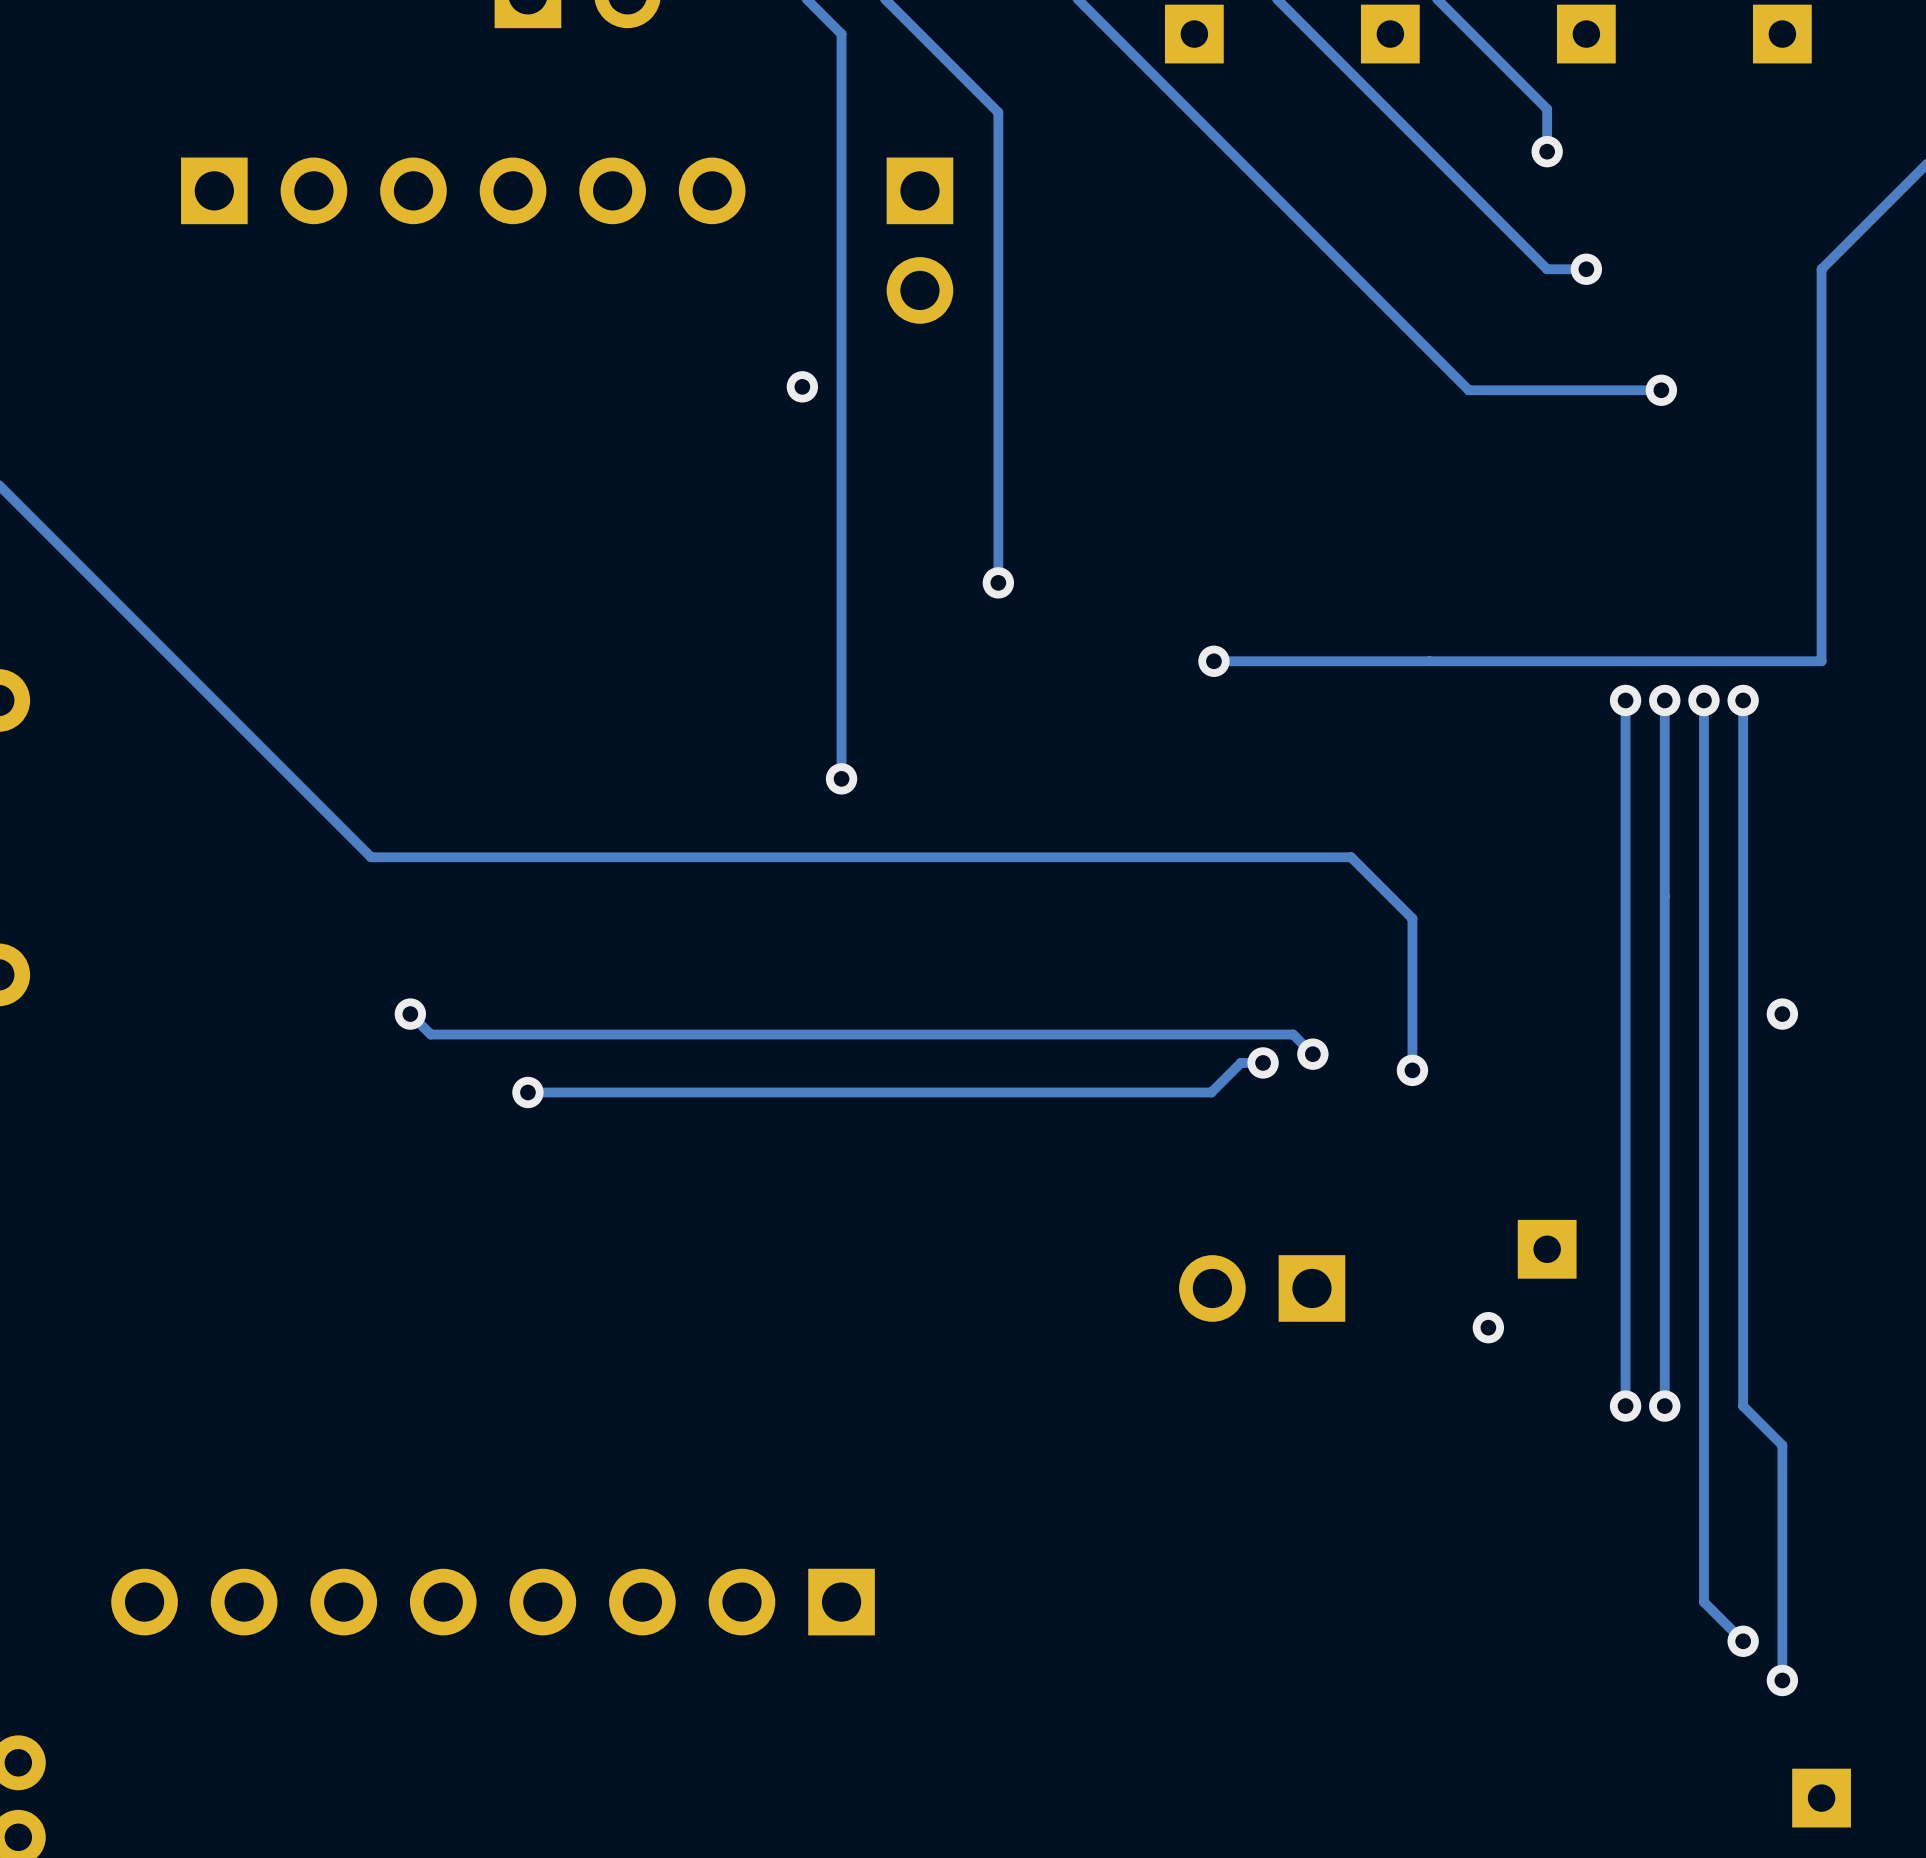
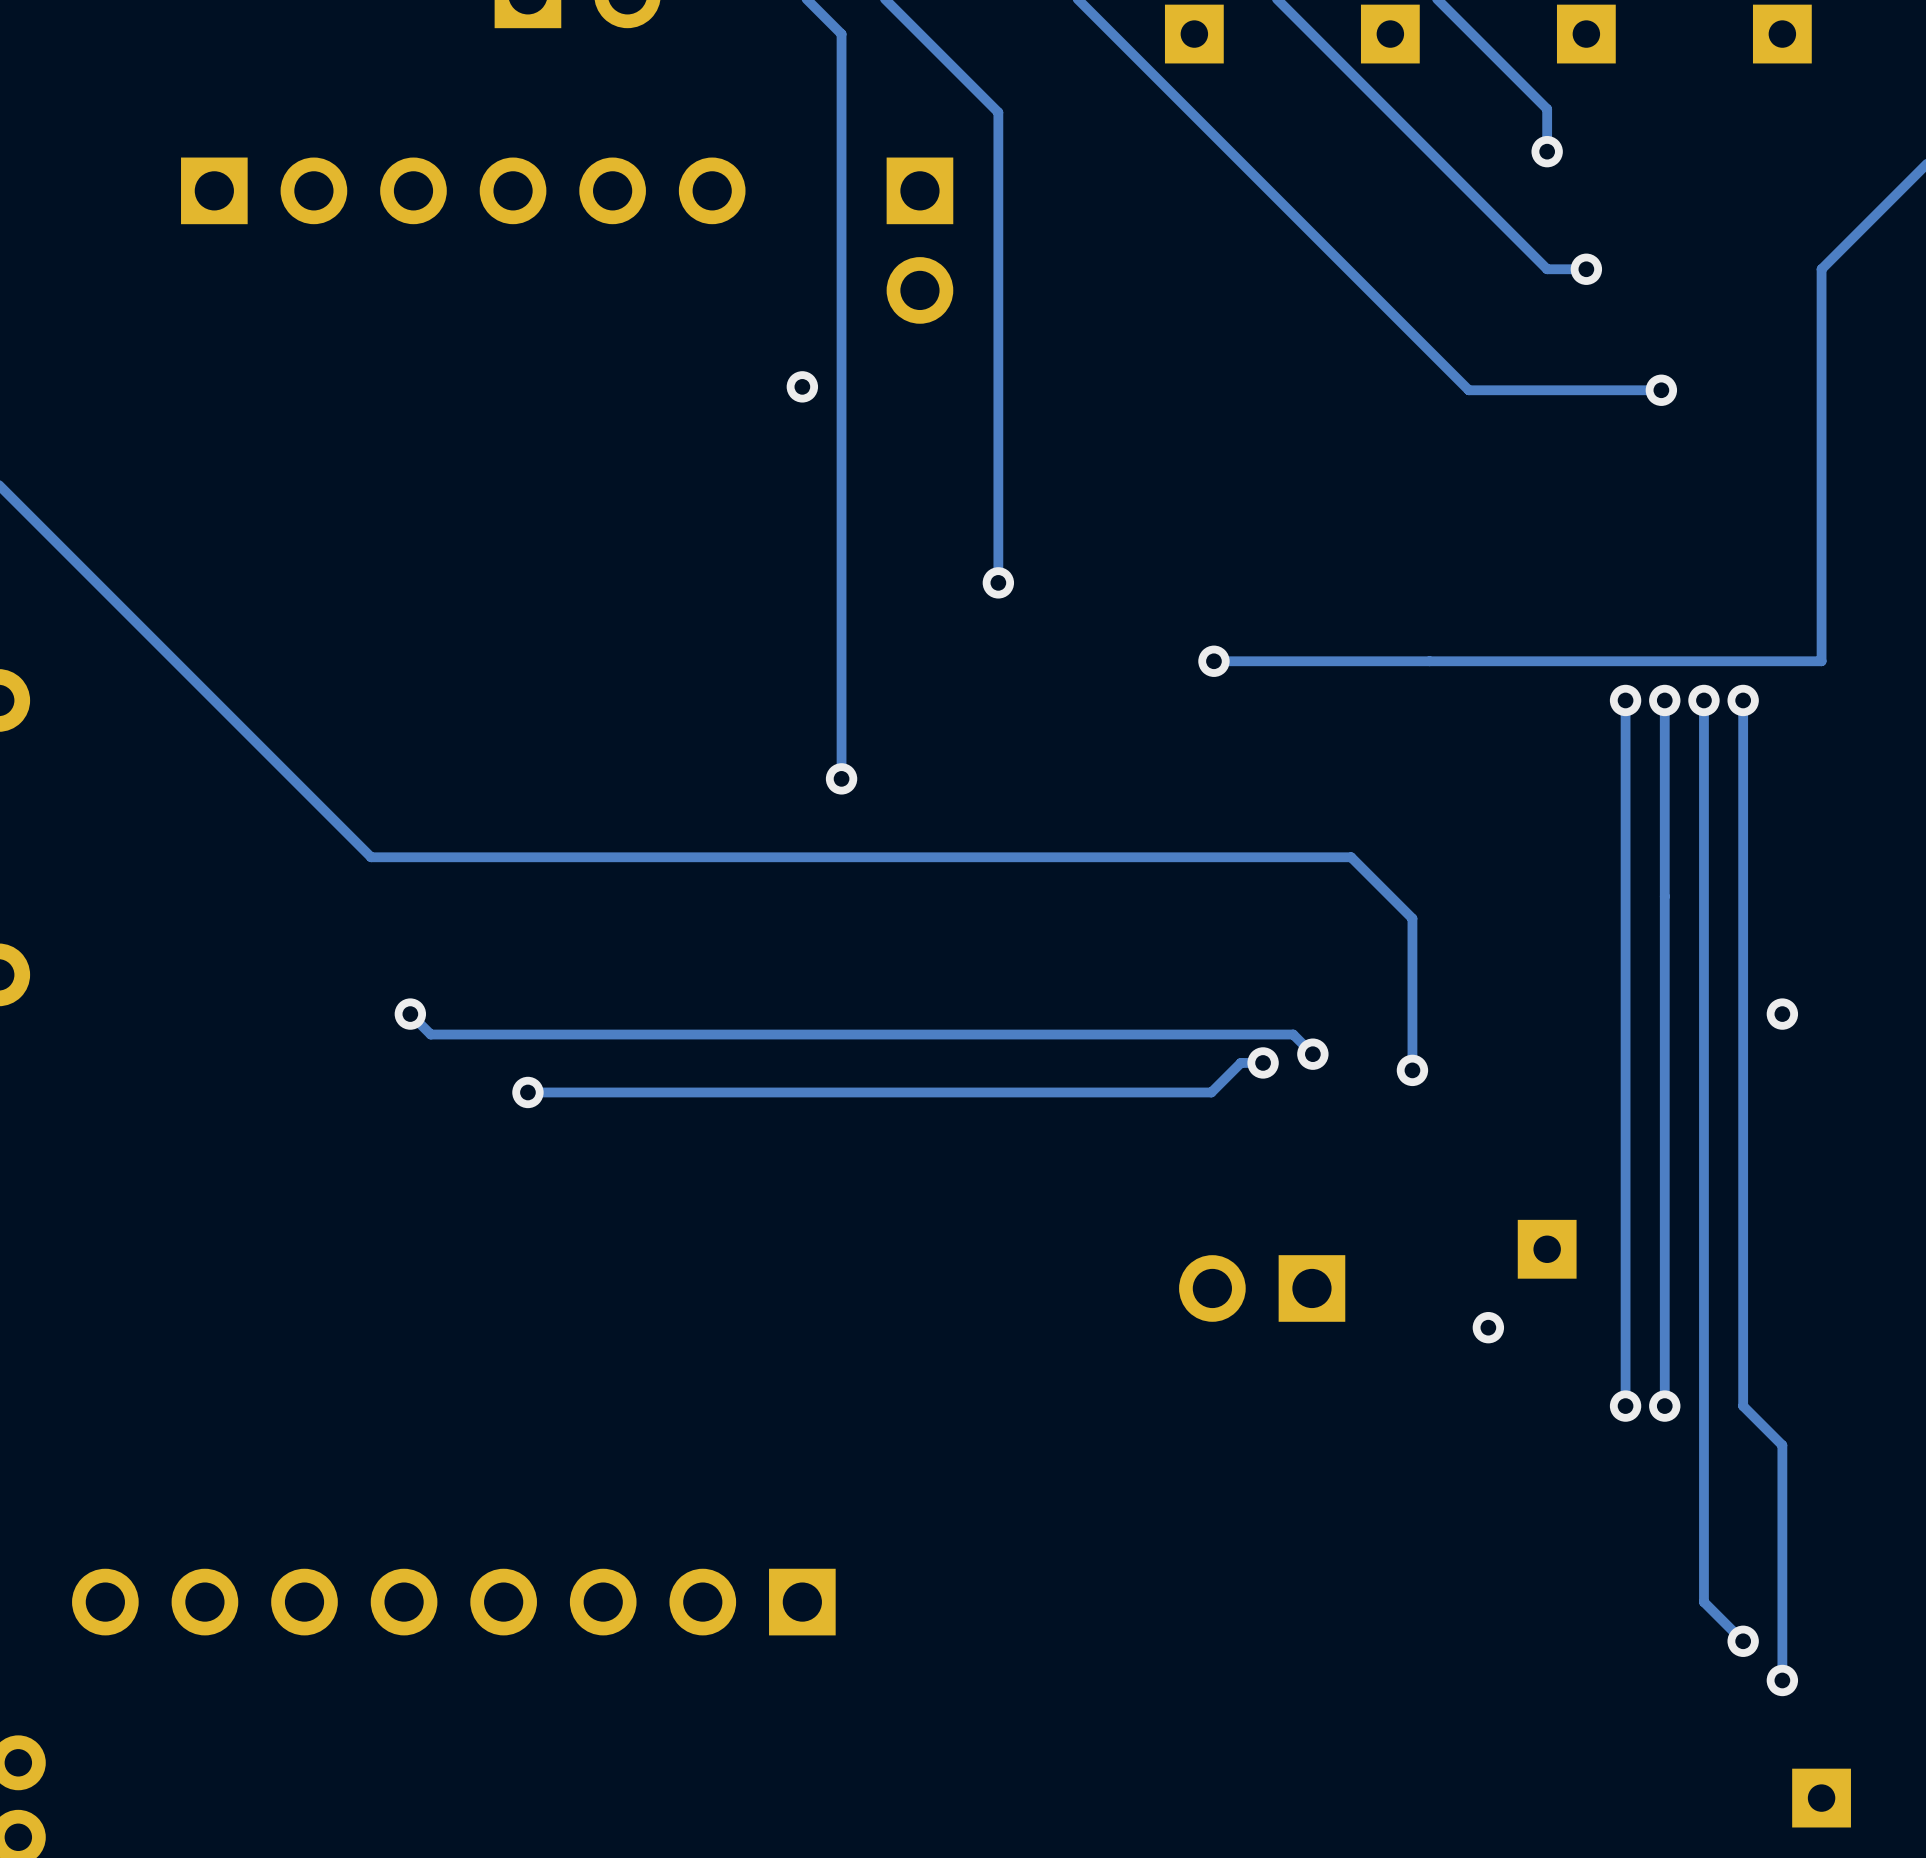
part position: (493, 1602) -> (453, 1602)

